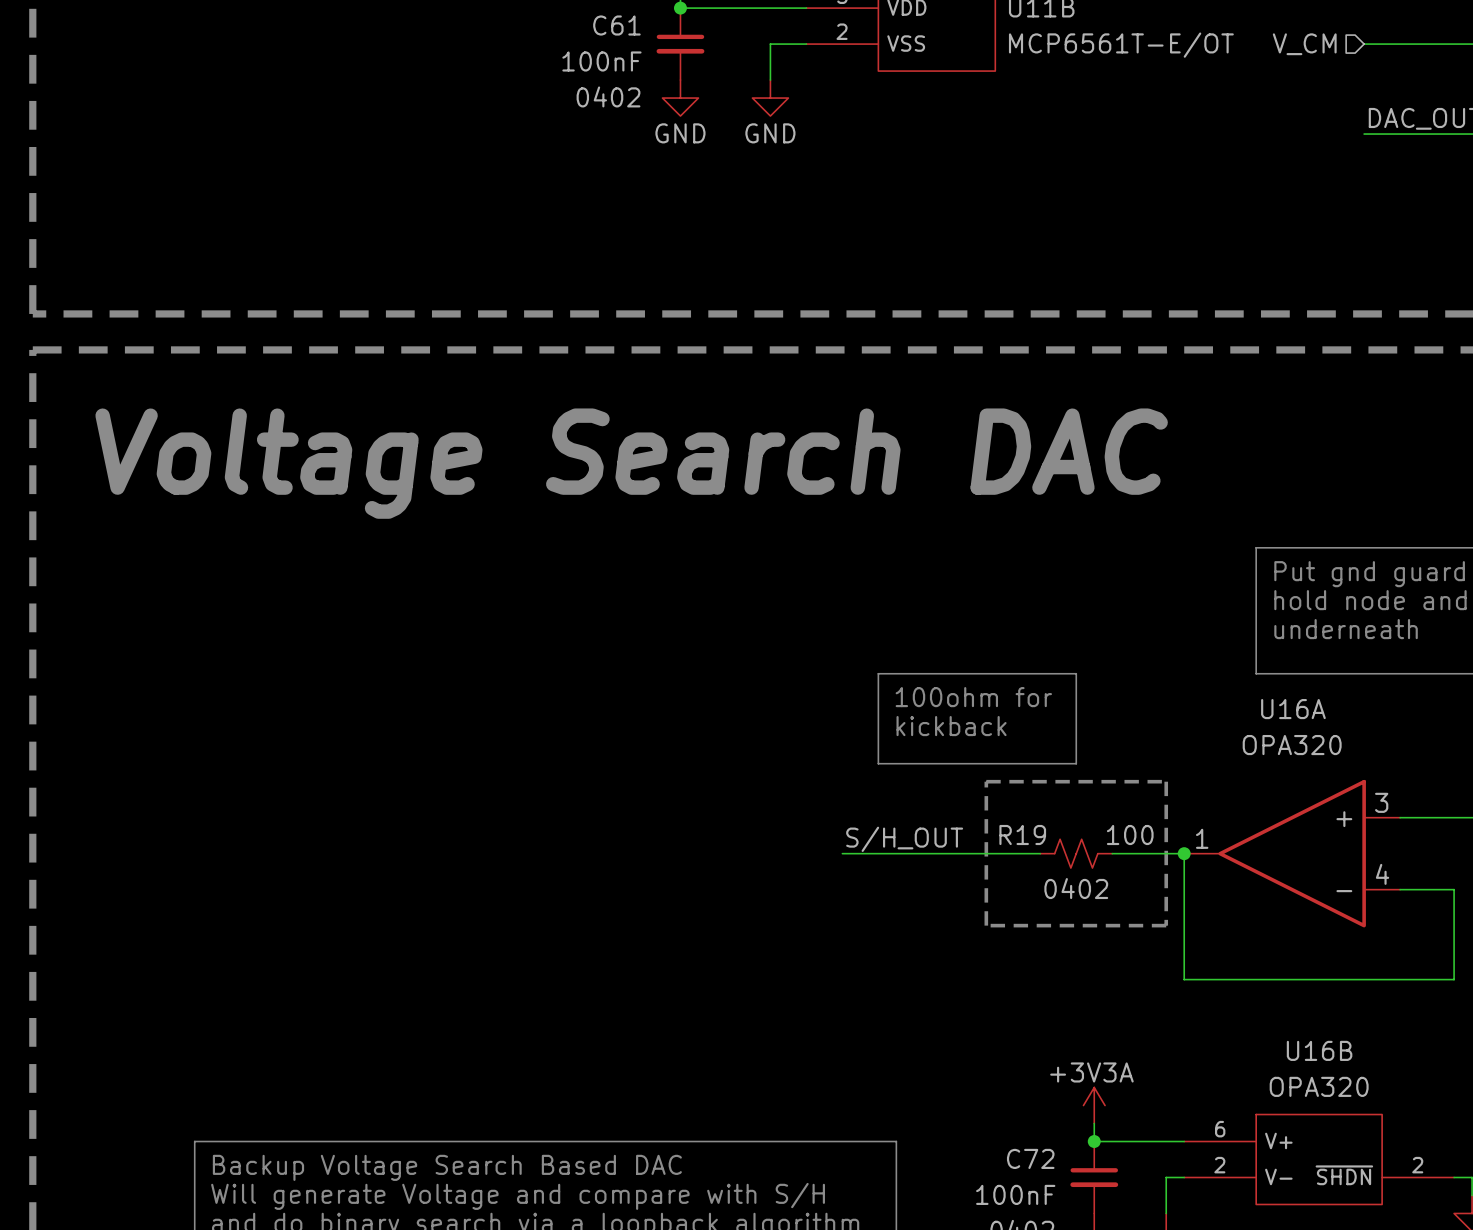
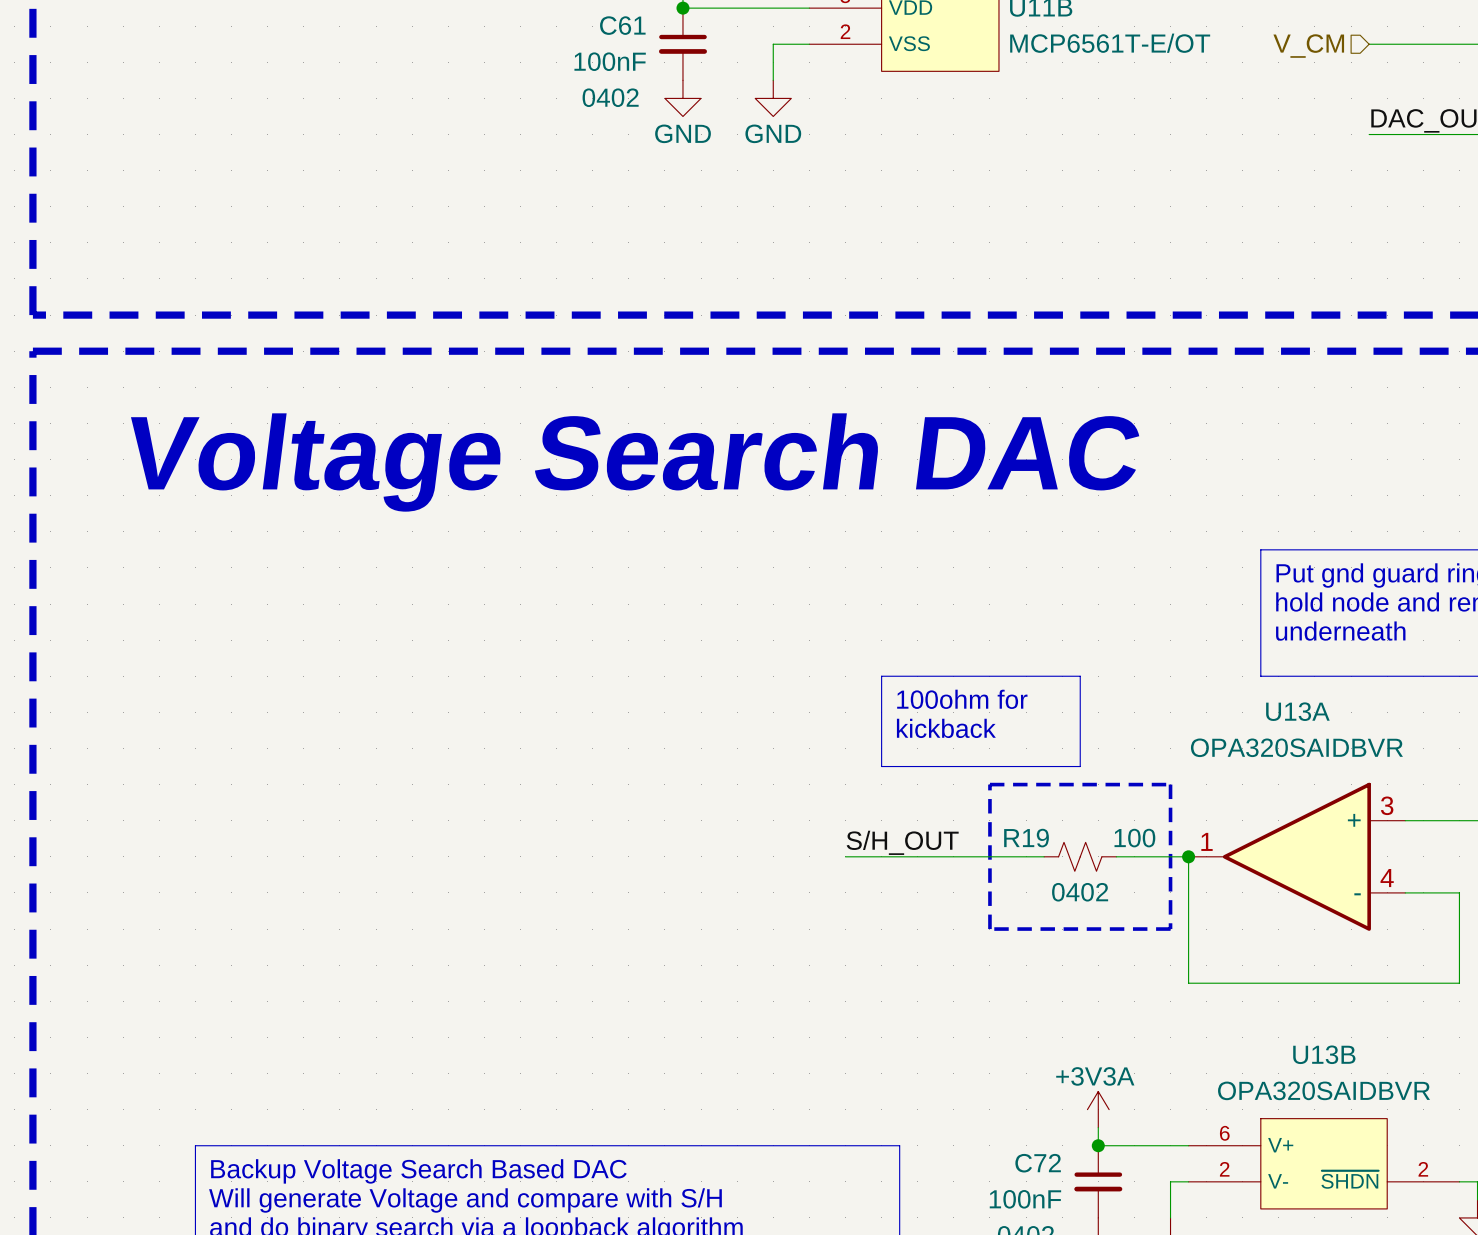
U16A name: U16A (1293, 709) -> U13A (1297, 711)
U16A value: OPA320 (1292, 745) -> OPA320SAIDBVR (1296, 747)
U16B name: U16B (1319, 1050) -> U13B (1324, 1054)
U16B value: OPA320 (1319, 1086) -> OPA320SAIDBVR (1324, 1090)

